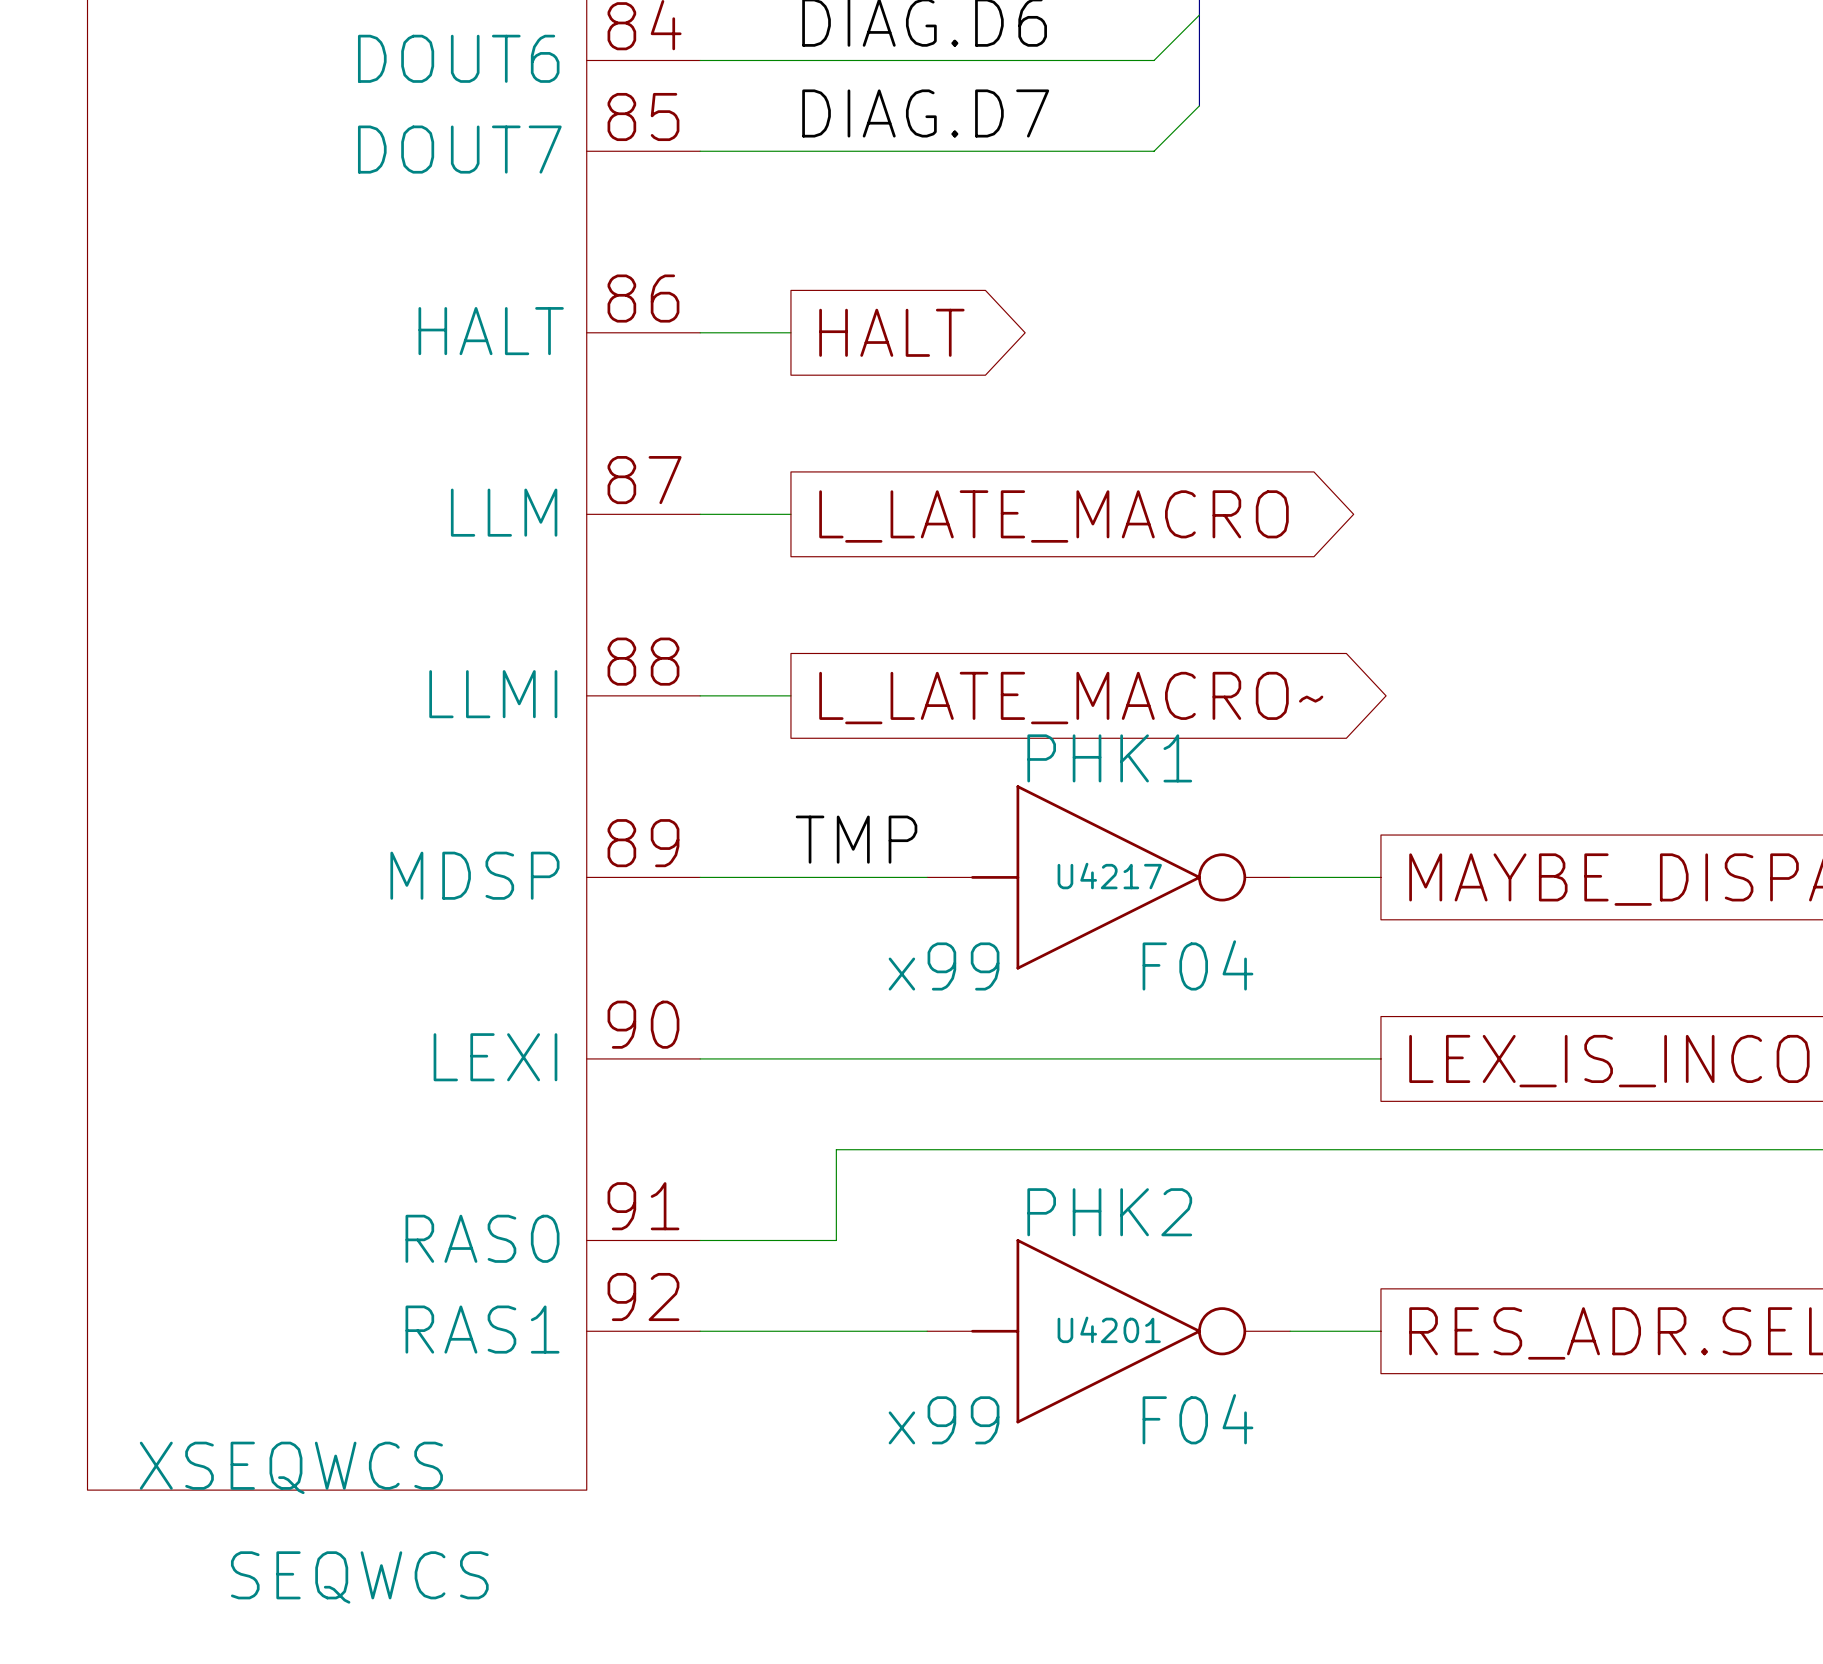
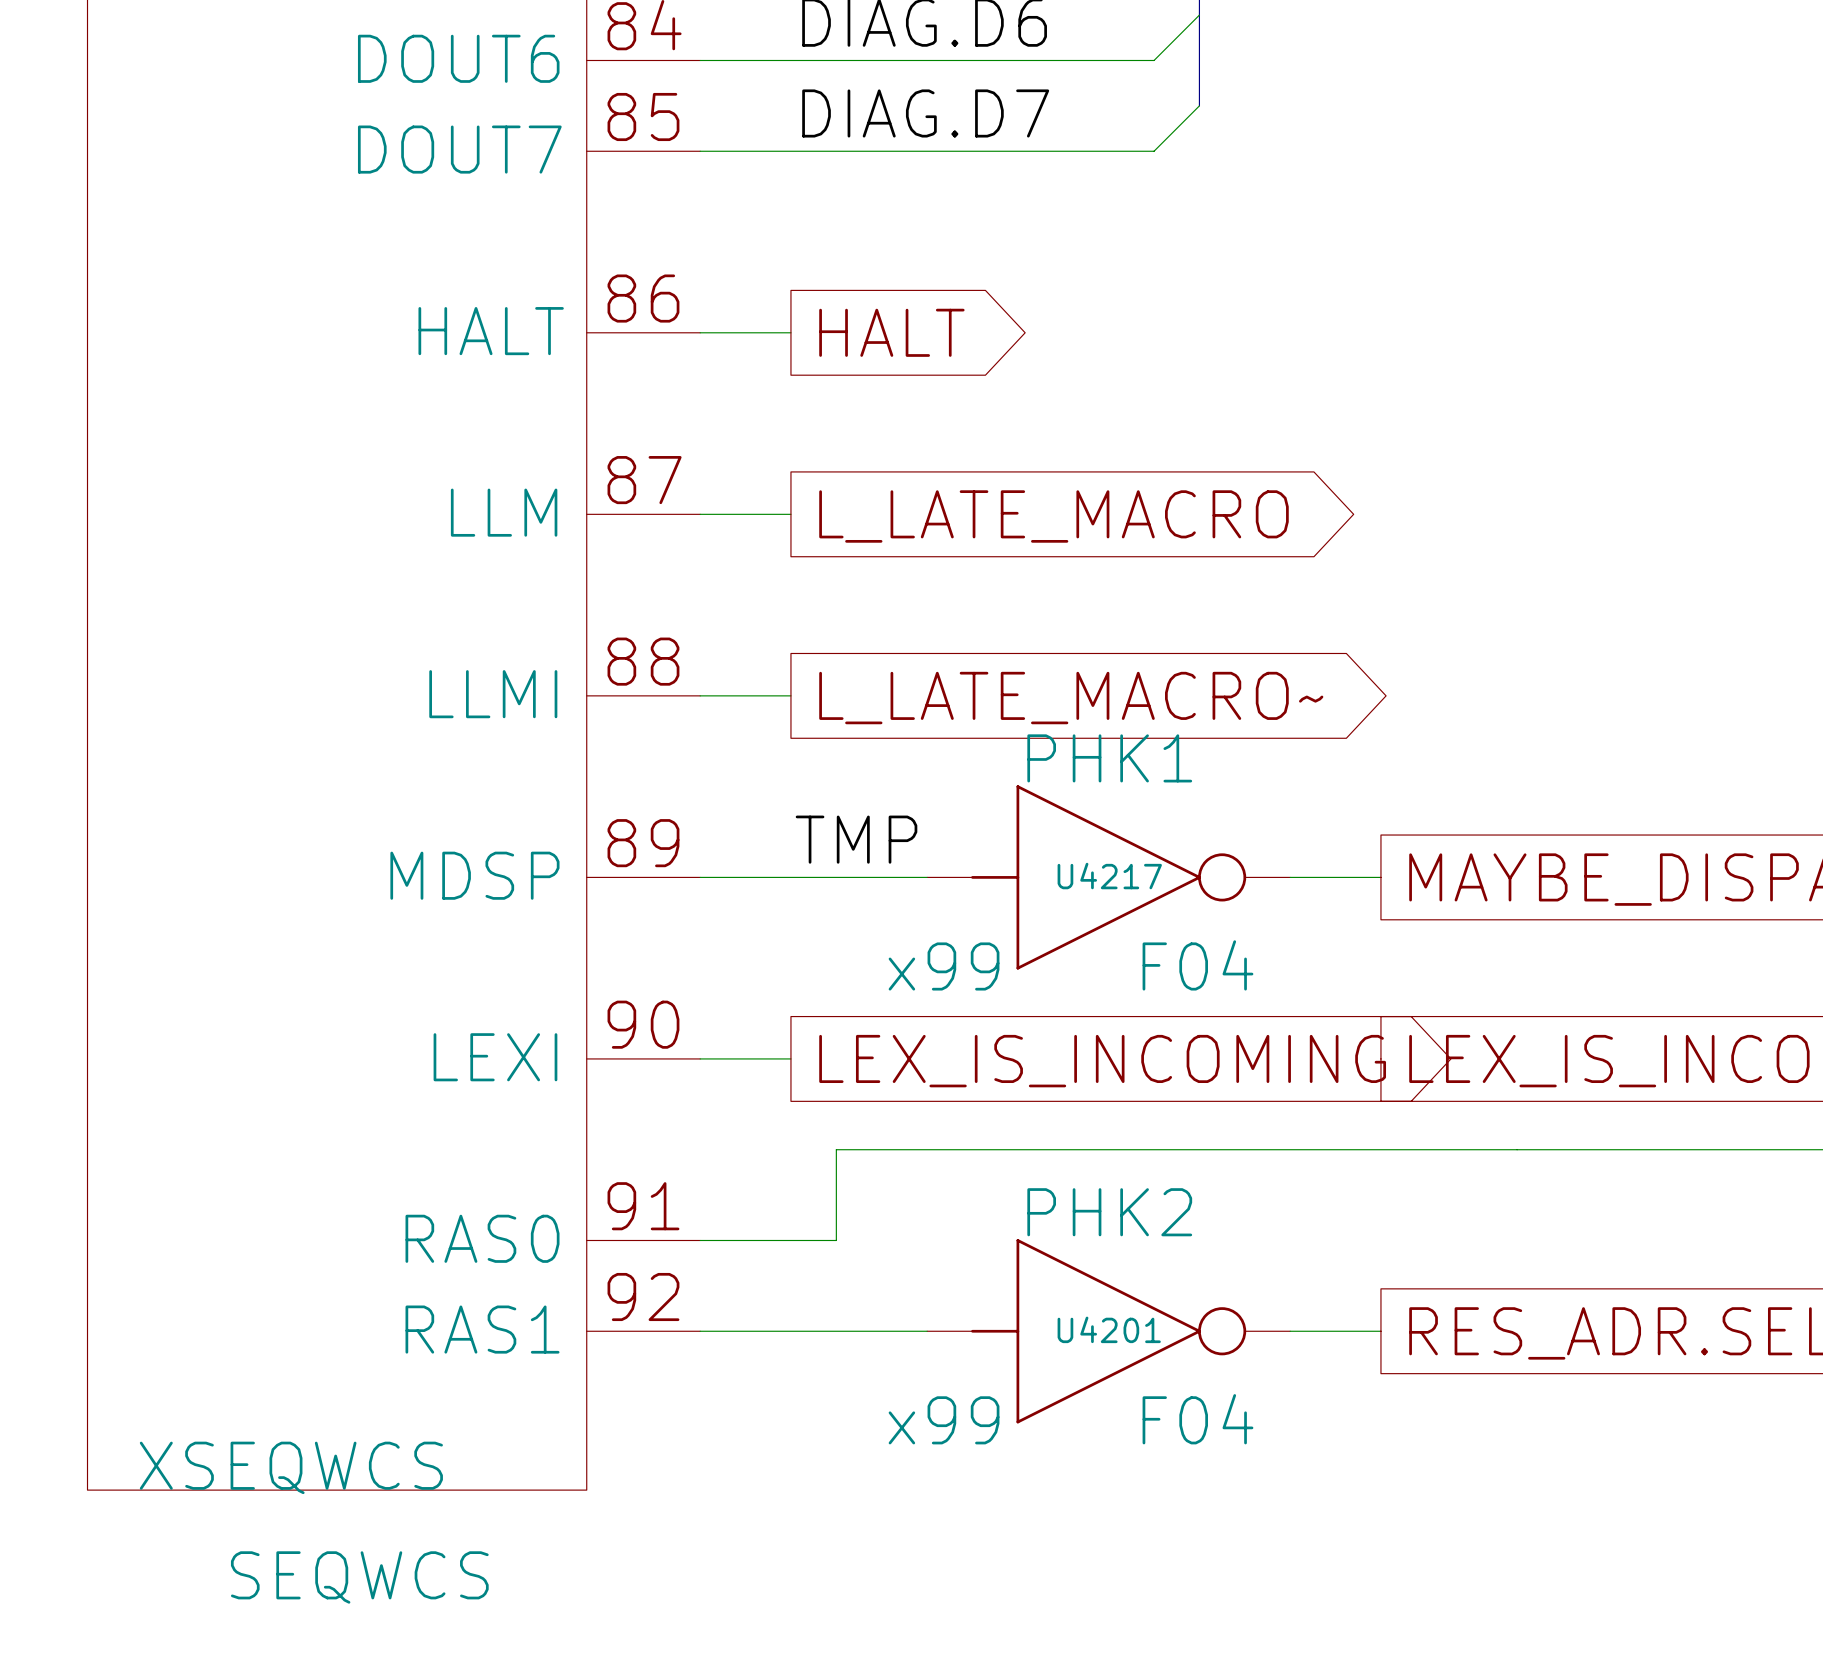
wire: (790, 1058) (1380, 1058) -> none
global label: none -> LEX_IS_INCOMING (1102, 1061)

